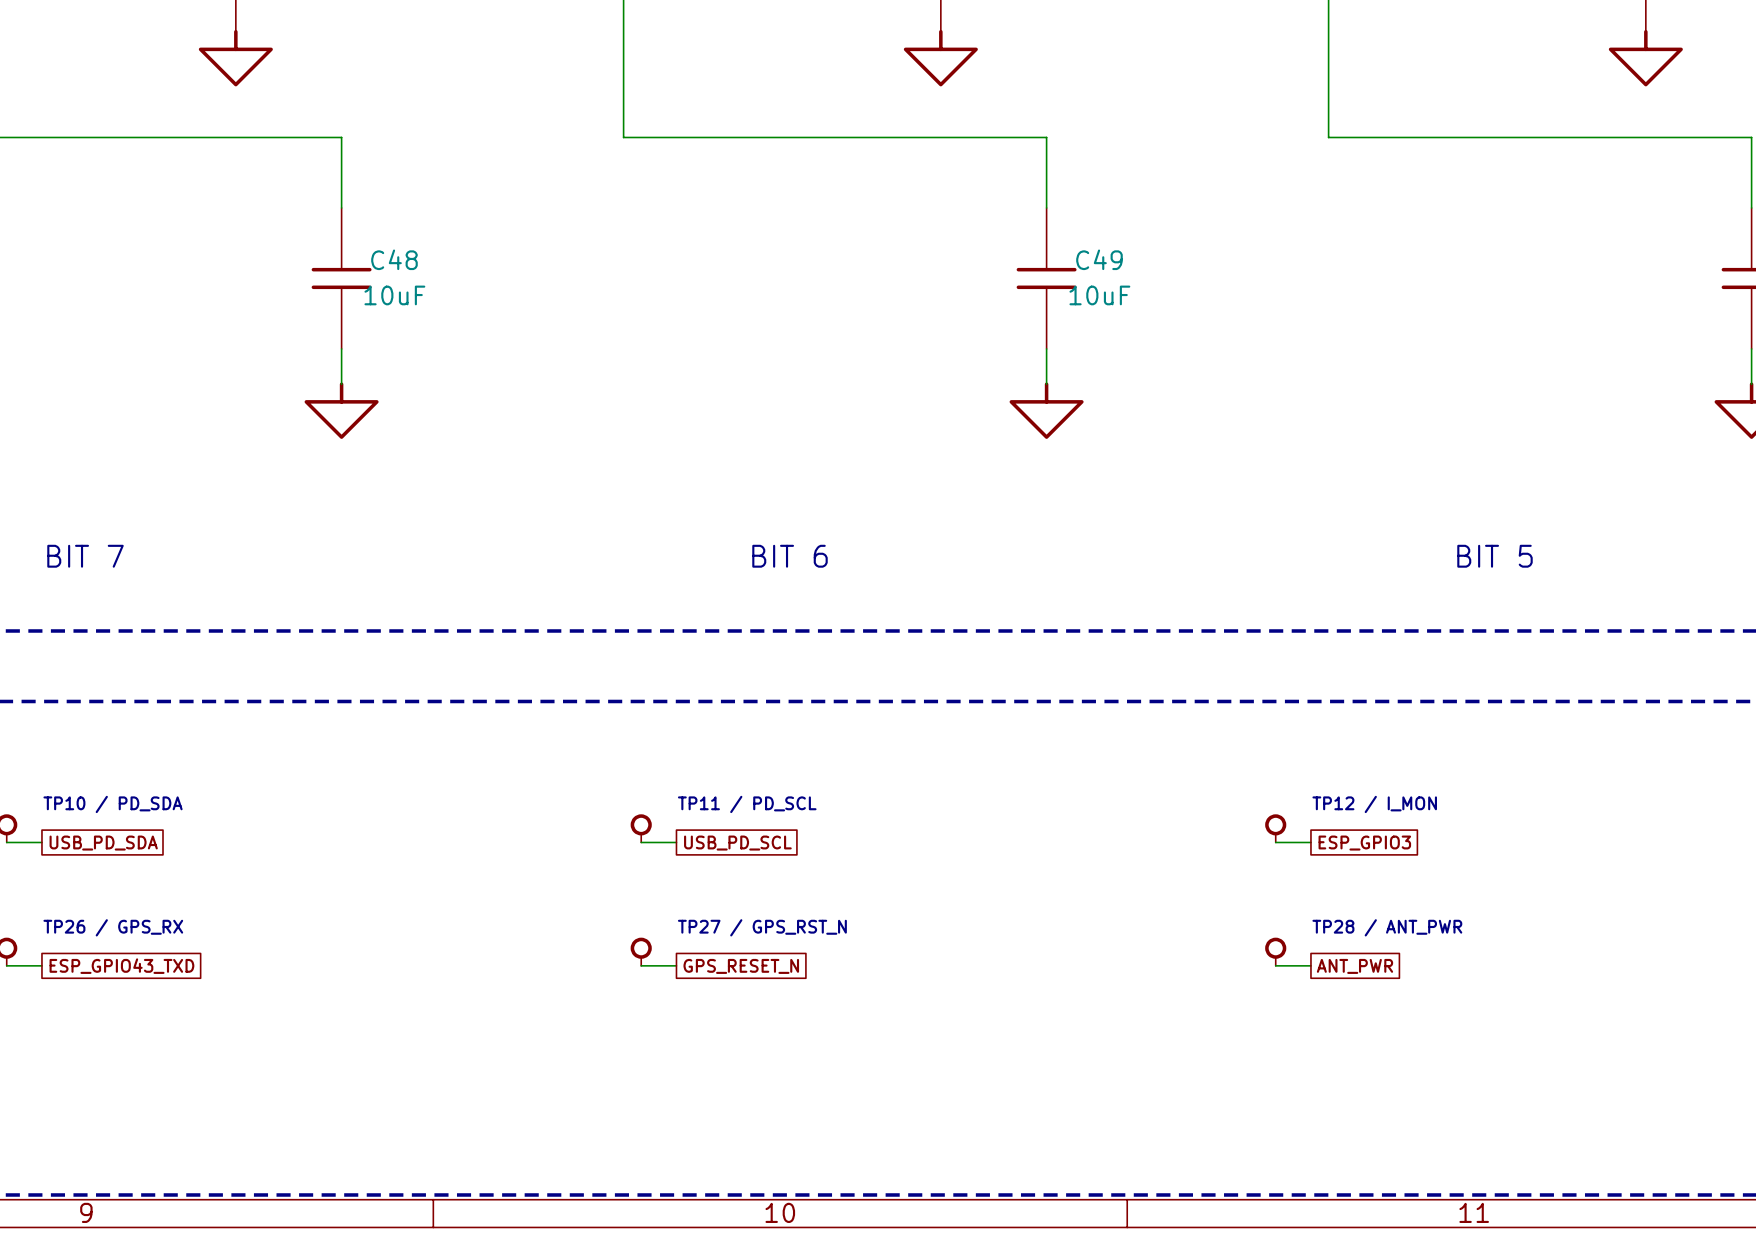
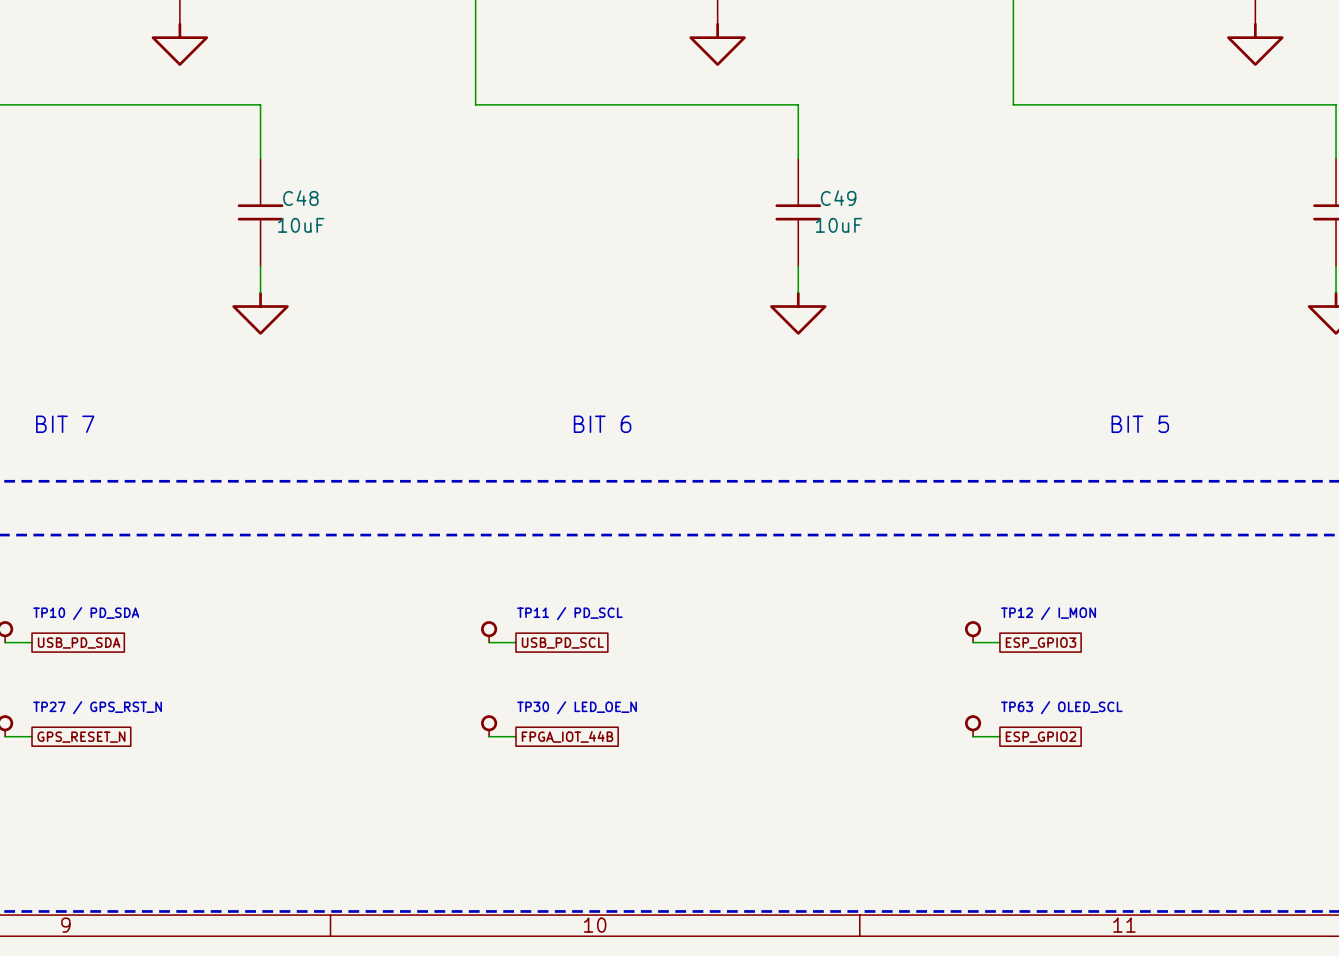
text: TP26 / GPS_RX (113, 927) -> TP27 / GPS_RST_N (97, 707)
text: TP27 / GPS_RST_N (762, 927) -> TP30 / LED_OE_N (577, 707)
text: TP28 / ANT_PWR (1387, 927) -> TP63 / OLED_SCL (1061, 707)
global label: ESP_GPIO43_TXD (121, 966) -> GPS_RESET_N (81, 737)
global label: GPS_RESET_N (741, 966) -> FPGA_IOT_44B (567, 736)
global label: ANT_PWR (1354, 966) -> ESP_GPIO2 (1041, 737)

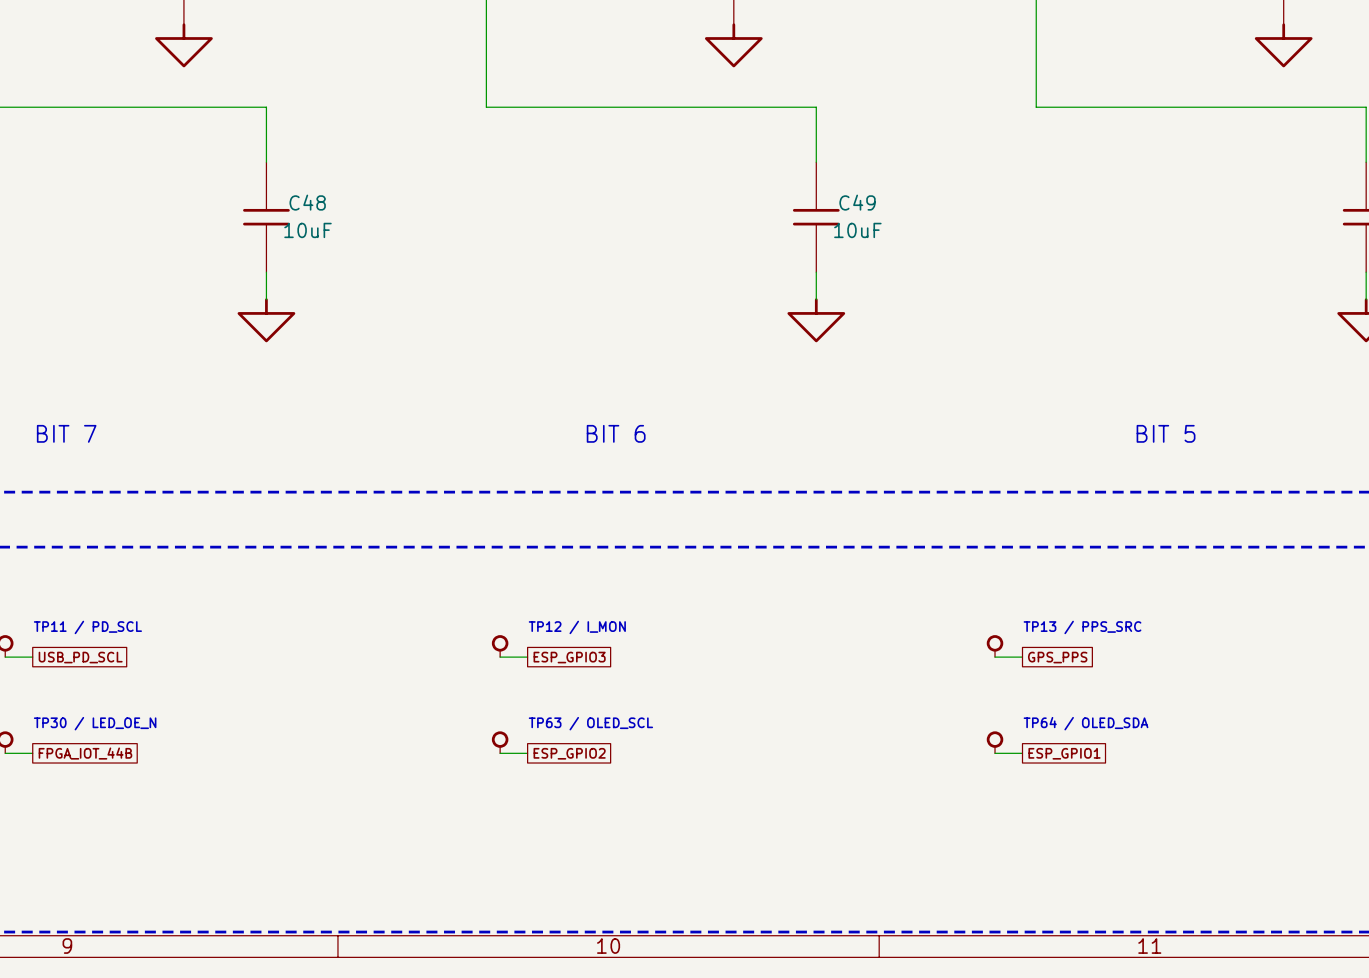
text: TP10 / PD_SDA (86, 613) -> TP11 / PD_SCL (87, 627)
text: TP11 / PD_SCL (569, 613) -> TP12 / I_MON (577, 627)
text: TP12 / I_MON (1048, 613) -> TP13 / PPS_SRC (1082, 627)
global label: USB_PD_SDA (79, 643) -> USB_PD_SCL (80, 657)
global label: USB_PD_SCL (562, 643) -> ESP_GPIO3 (569, 657)
global label: ESP_GPIO3 (1041, 643) -> GPS_PPS (1057, 657)
text: TP27 / GPS_RST_N (97, 707) -> TP30 / LED_OE_N (95, 723)
text: TP30 / LED_OE_N (577, 707) -> TP63 / OLED_SCL (590, 723)
text: TP63 / OLED_SCL (1061, 707) -> TP64 / OLED_SDA (1086, 723)
global label: FPGA_IOT_44B (567, 736) -> ESP_GPIO2 (569, 753)
global label: GPS_RESET_N (81, 737) -> FPGA_IOT_44B (85, 753)
global label: ESP_GPIO2 (1041, 737) -> ESP_GPIO1 (1064, 753)

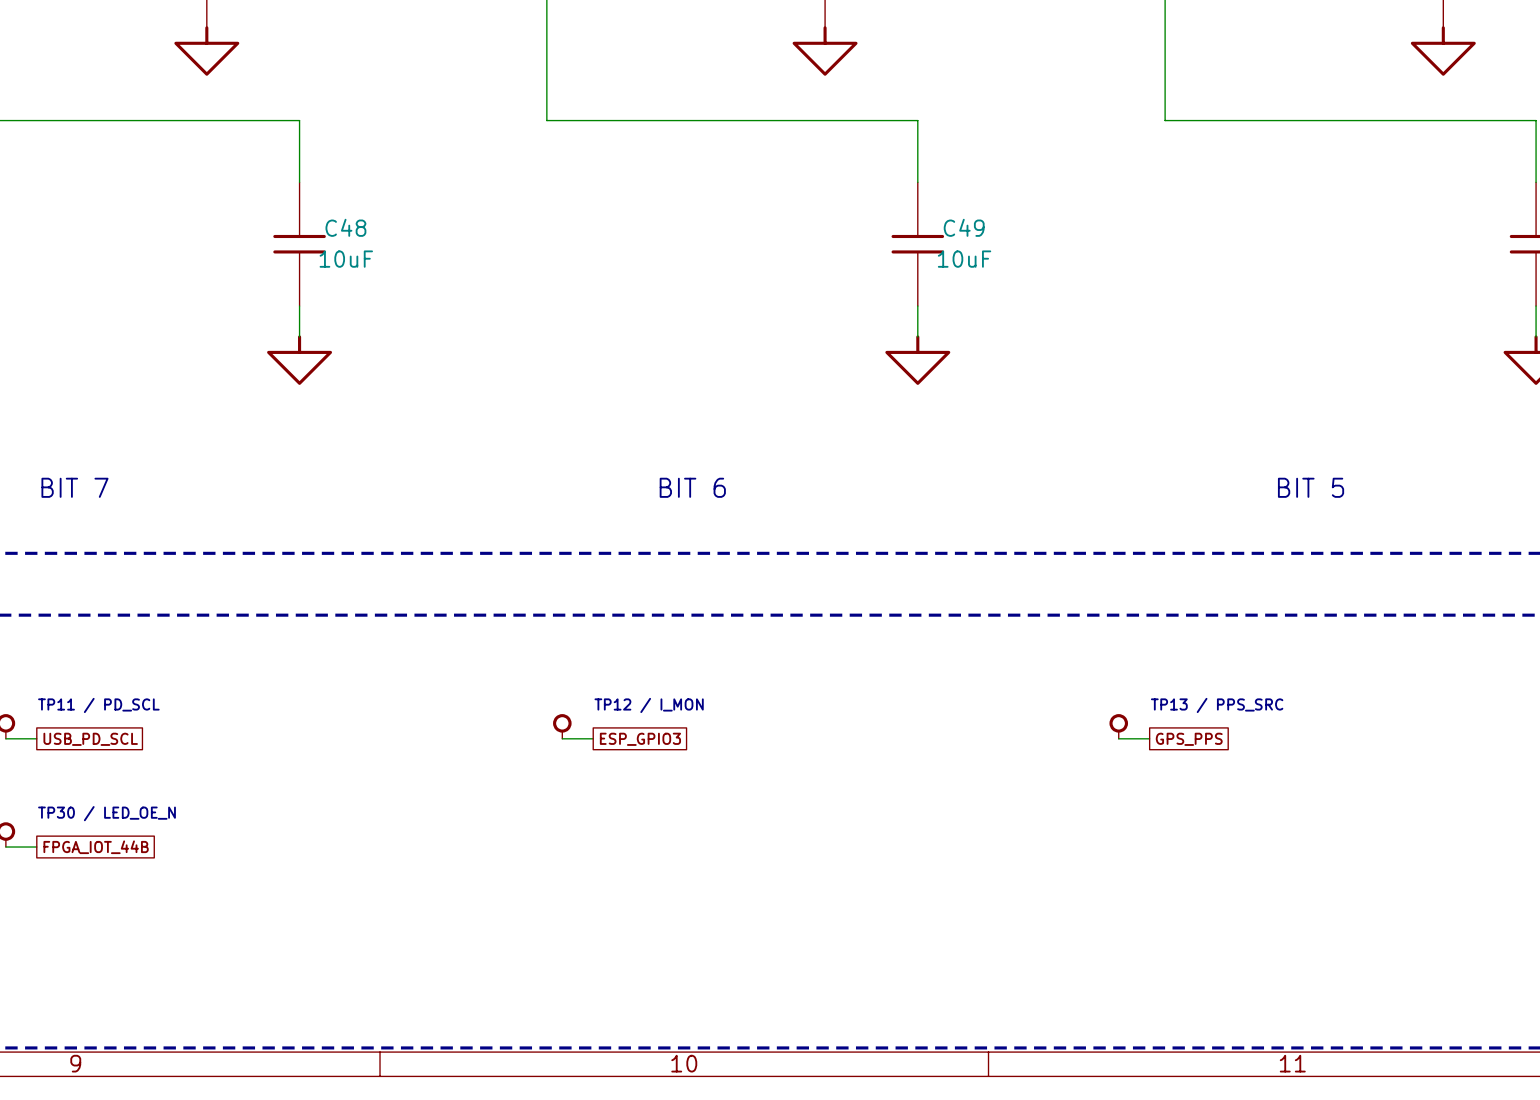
text: TP63 / OLED_SCL (590, 723) -> none
text: TP64 / OLED_SDA (1086, 723) -> none
part: (500, 742) -> none
part: (995, 742) -> none
wire: (500, 753) (527, 753) -> none
global label: ESP_GPIO2 (569, 753) -> none
wire: (995, 753) (1022, 753) -> none
global label: ESP_GPIO1 (1064, 753) -> none

